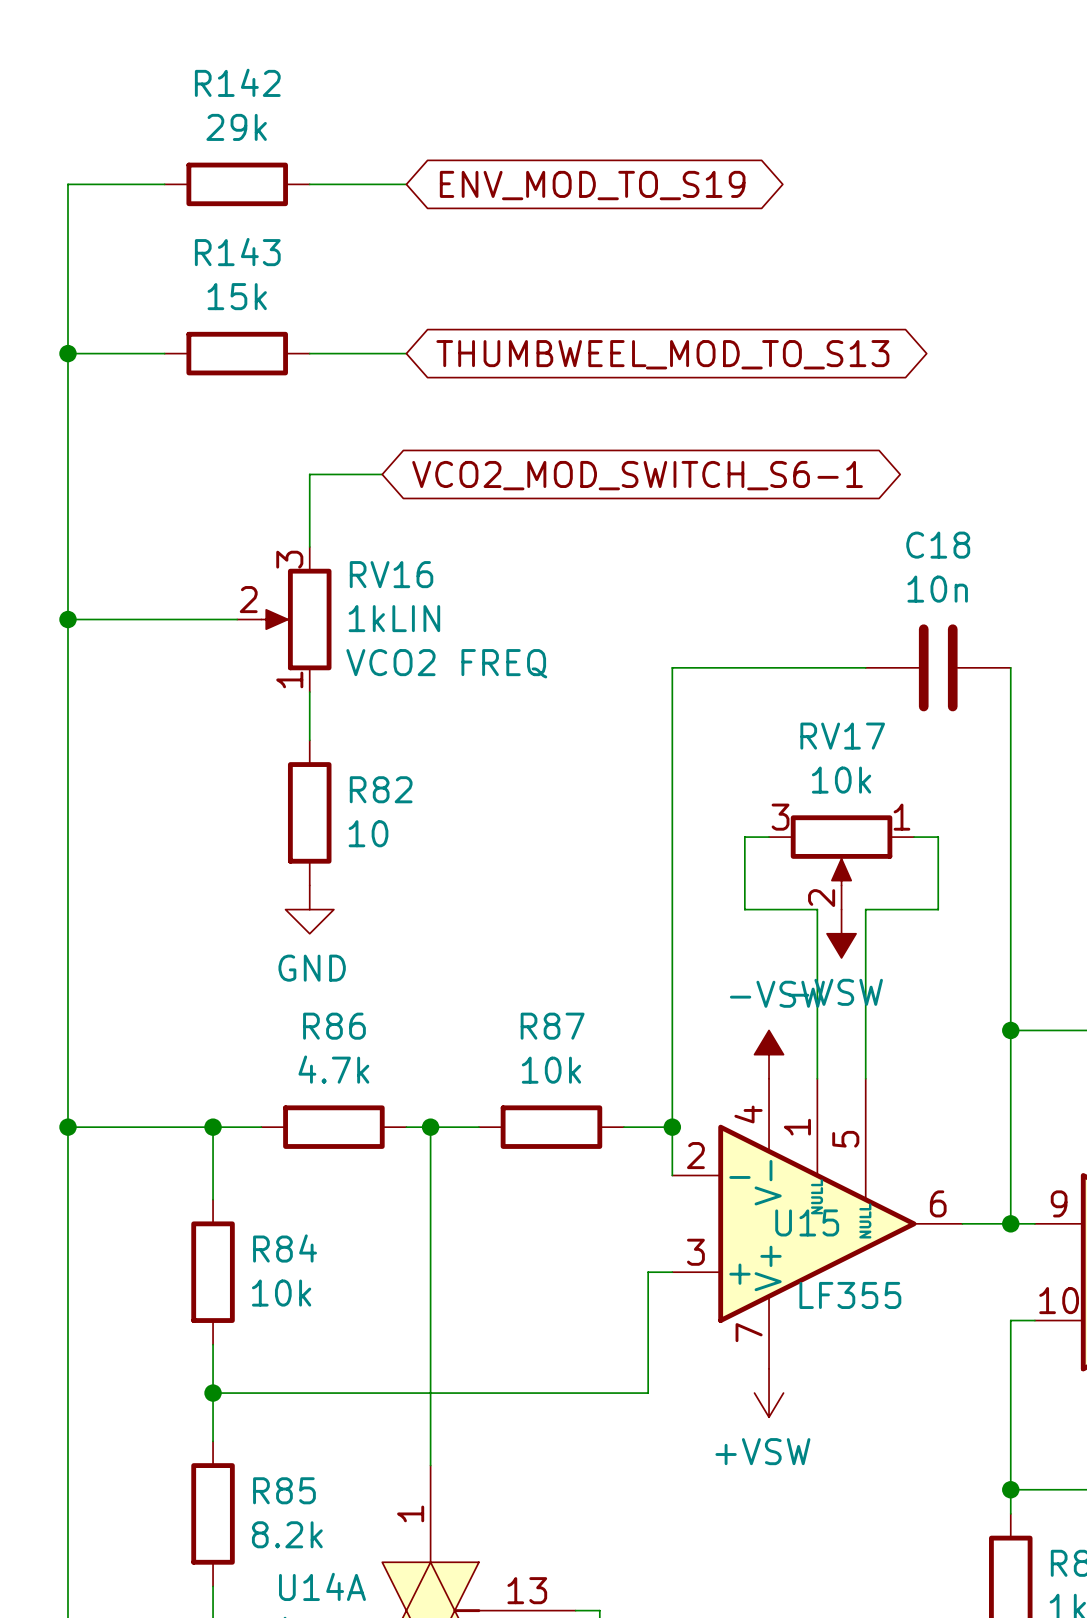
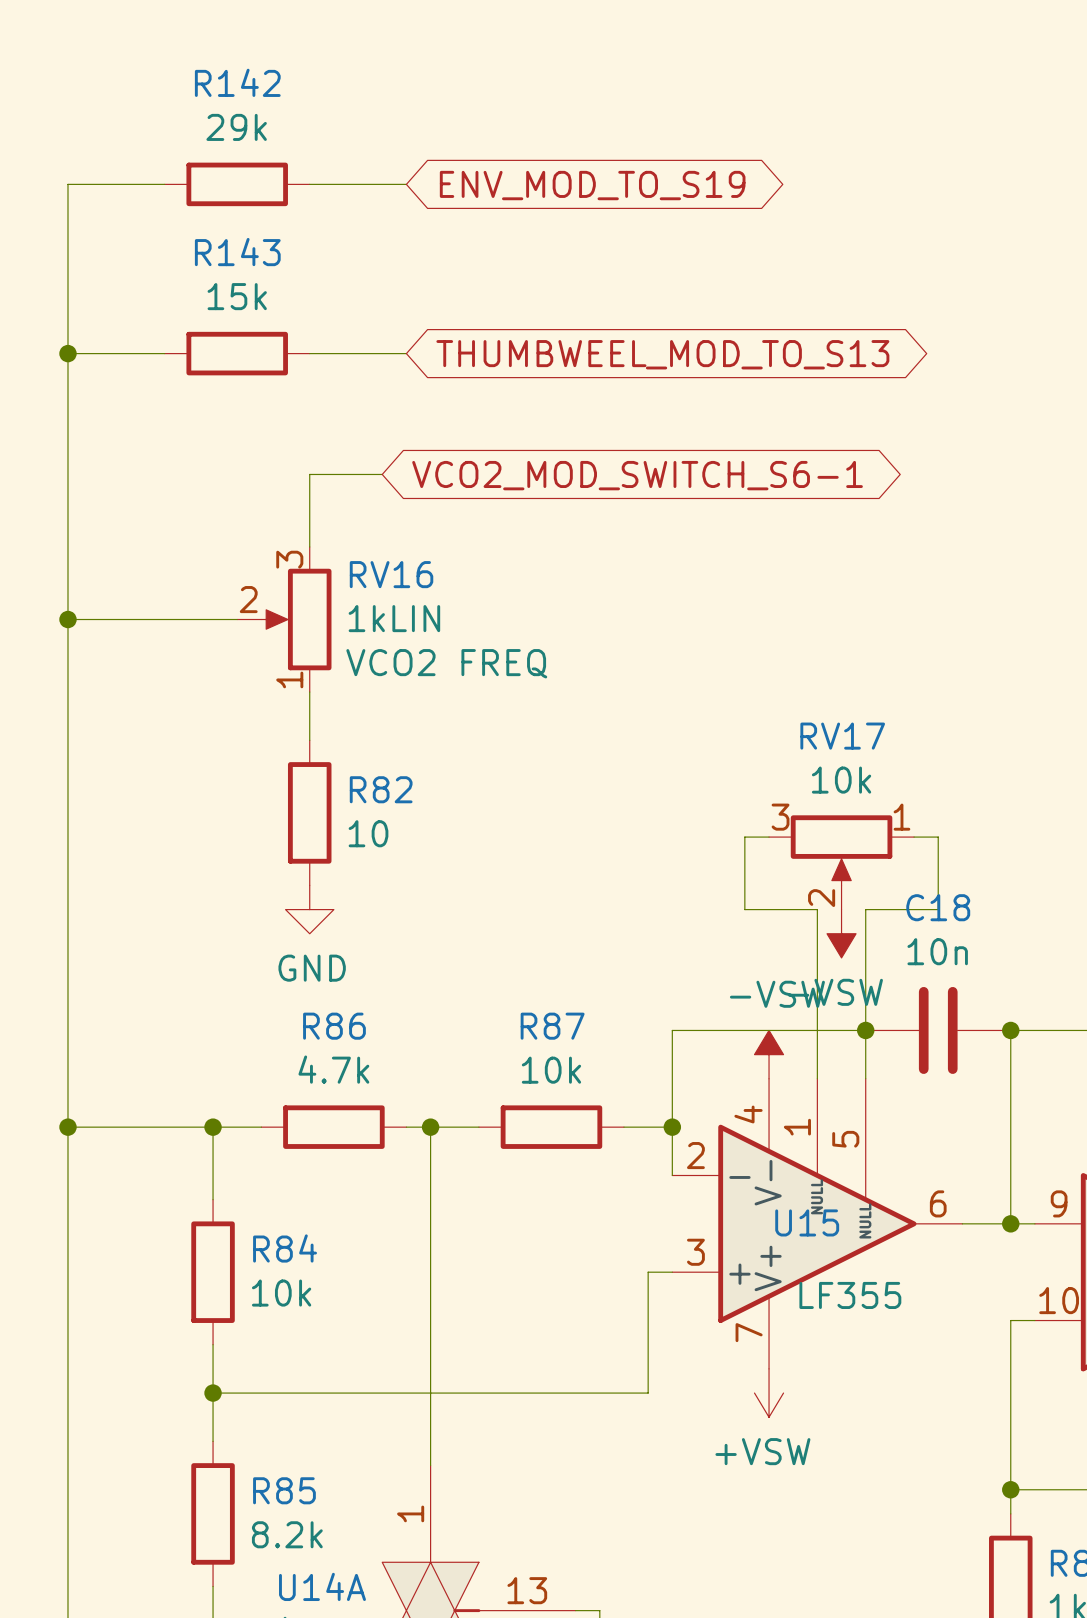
wire: (865, 667) (672, 667) (672, 1030) -> (865, 1030) (672, 1030)
C18 position: (938, 667) -> (938, 1030)
wire: (1010, 667) (1010, 1030) -> none
junction: none -> (865, 1030)

